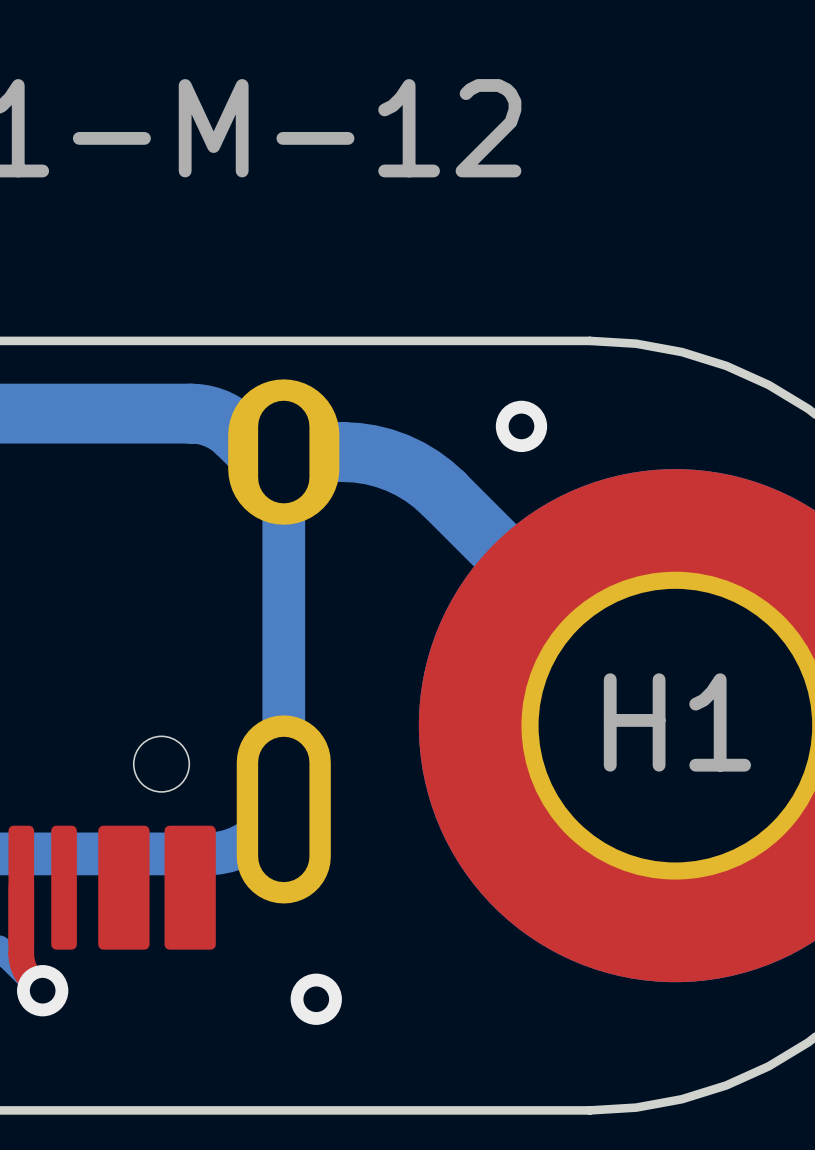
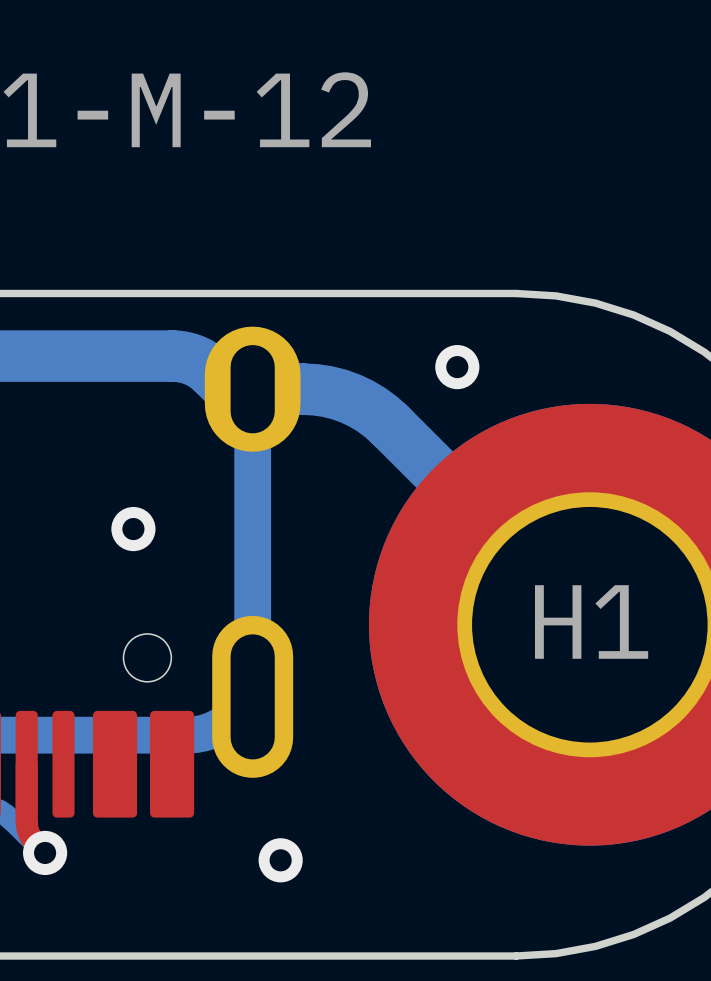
via: none -> (133, 529)

